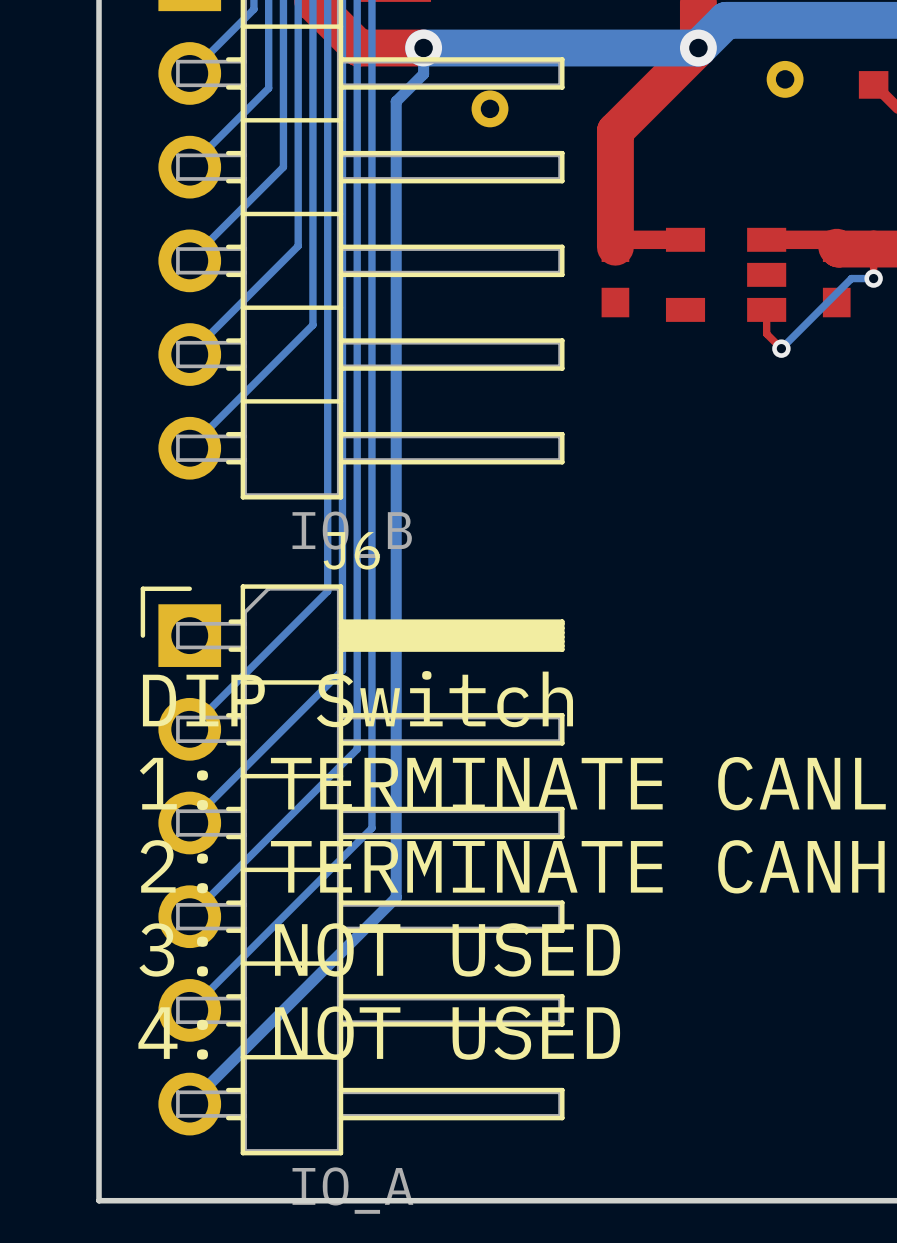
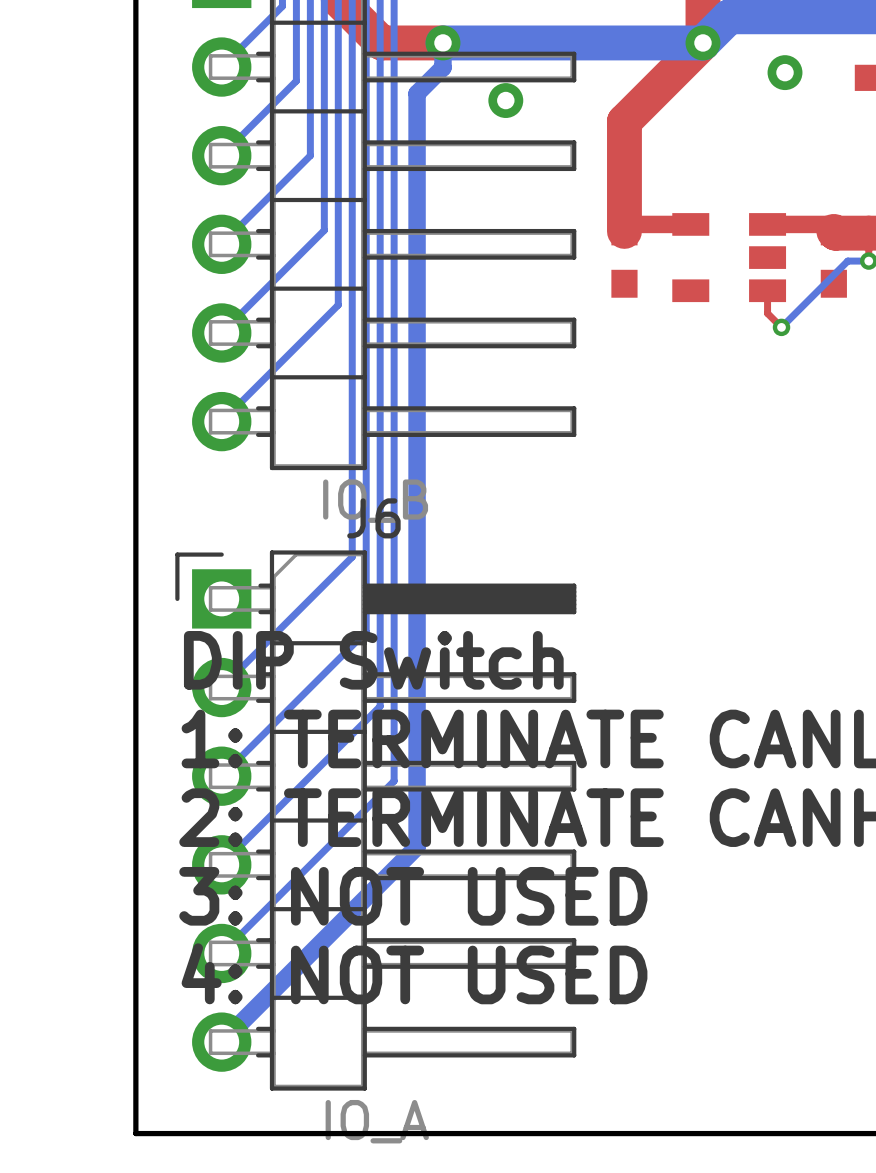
bottom track width: thin (423, 48) (423, 74) (396, 101) (396, 897) (189, 1104) -> thick (442, 42) (442, 67) (417, 93) (417, 846) (221, 1042)

